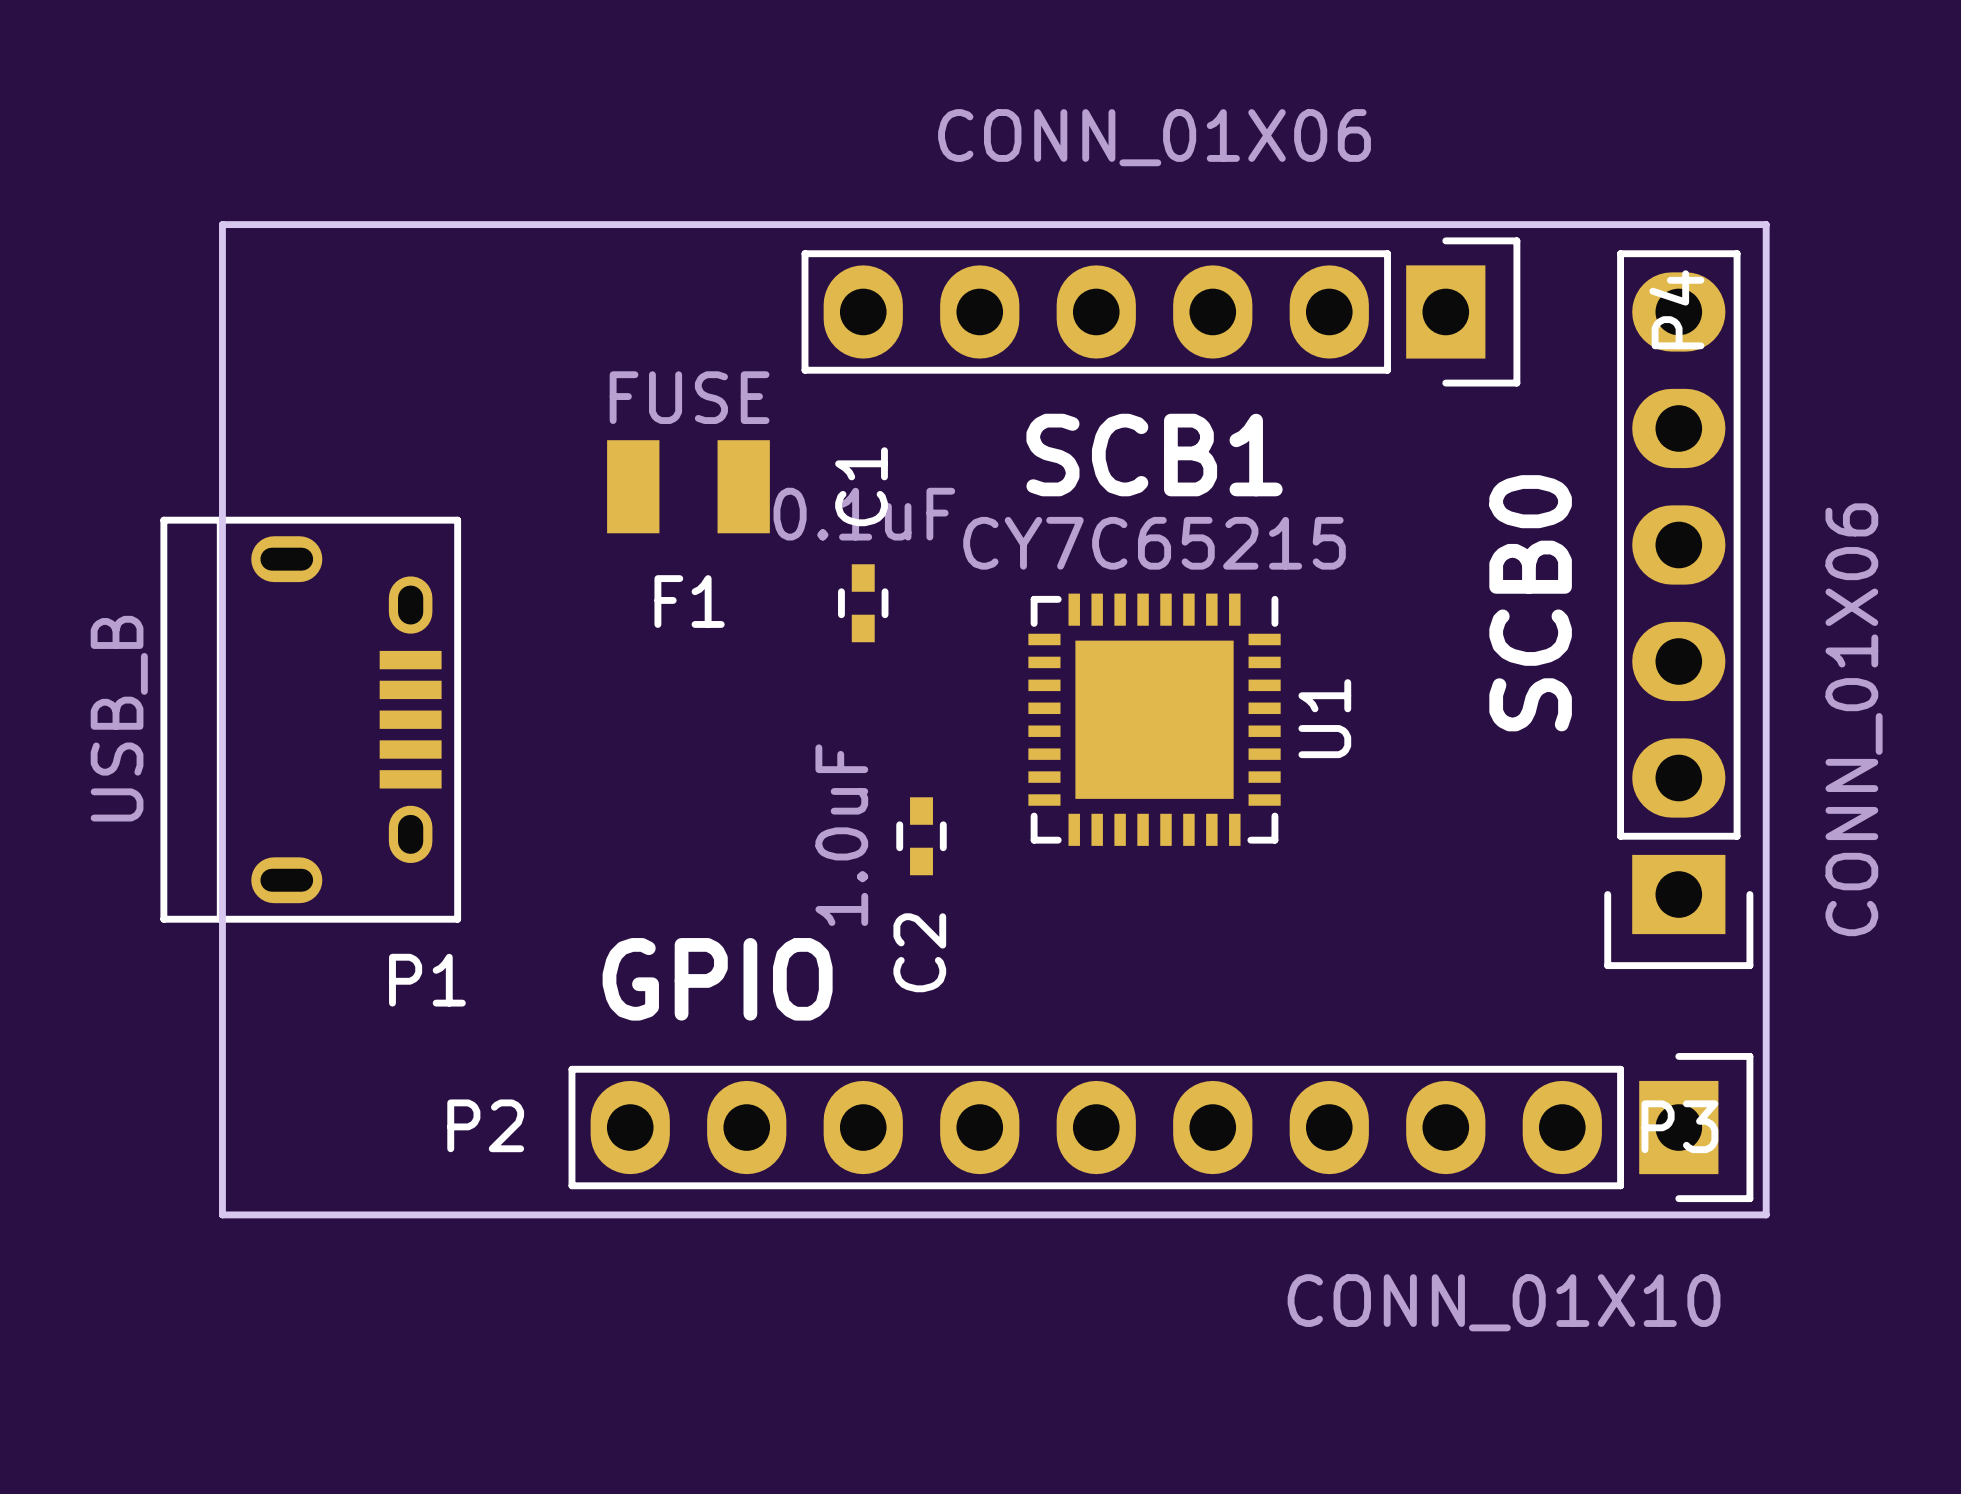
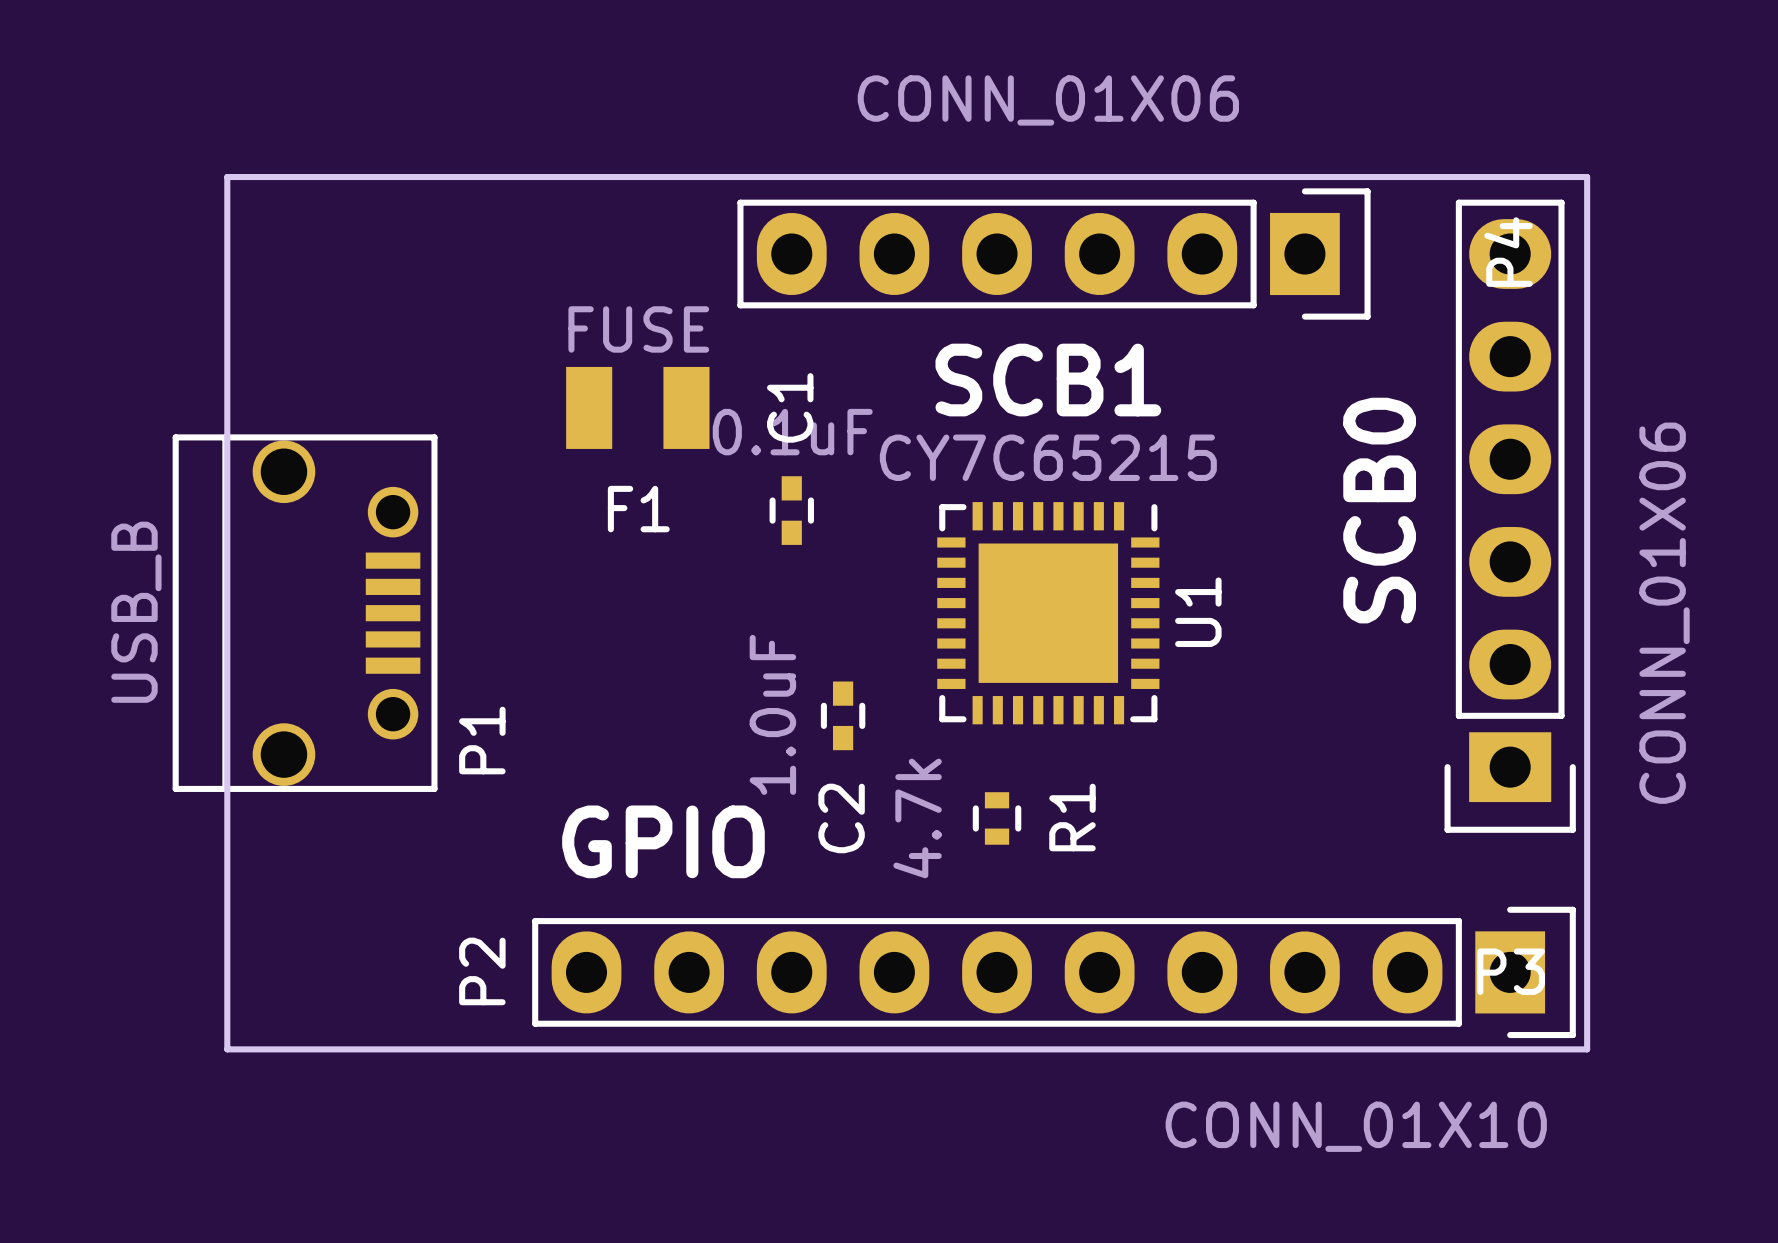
P1 footprint: [160, 516, 462, 923] -> [172, 434, 438, 792]
R1: none -> 4.7k (997, 818)
P1 name rotation: 0° (427, 980) -> 90° counterclockwise (482, 740)
P1 name position: P1 (427, 980) -> P1 (482, 740)
P2 name rotation: 0° (485, 1125) -> 90° counterclockwise (482, 971)

